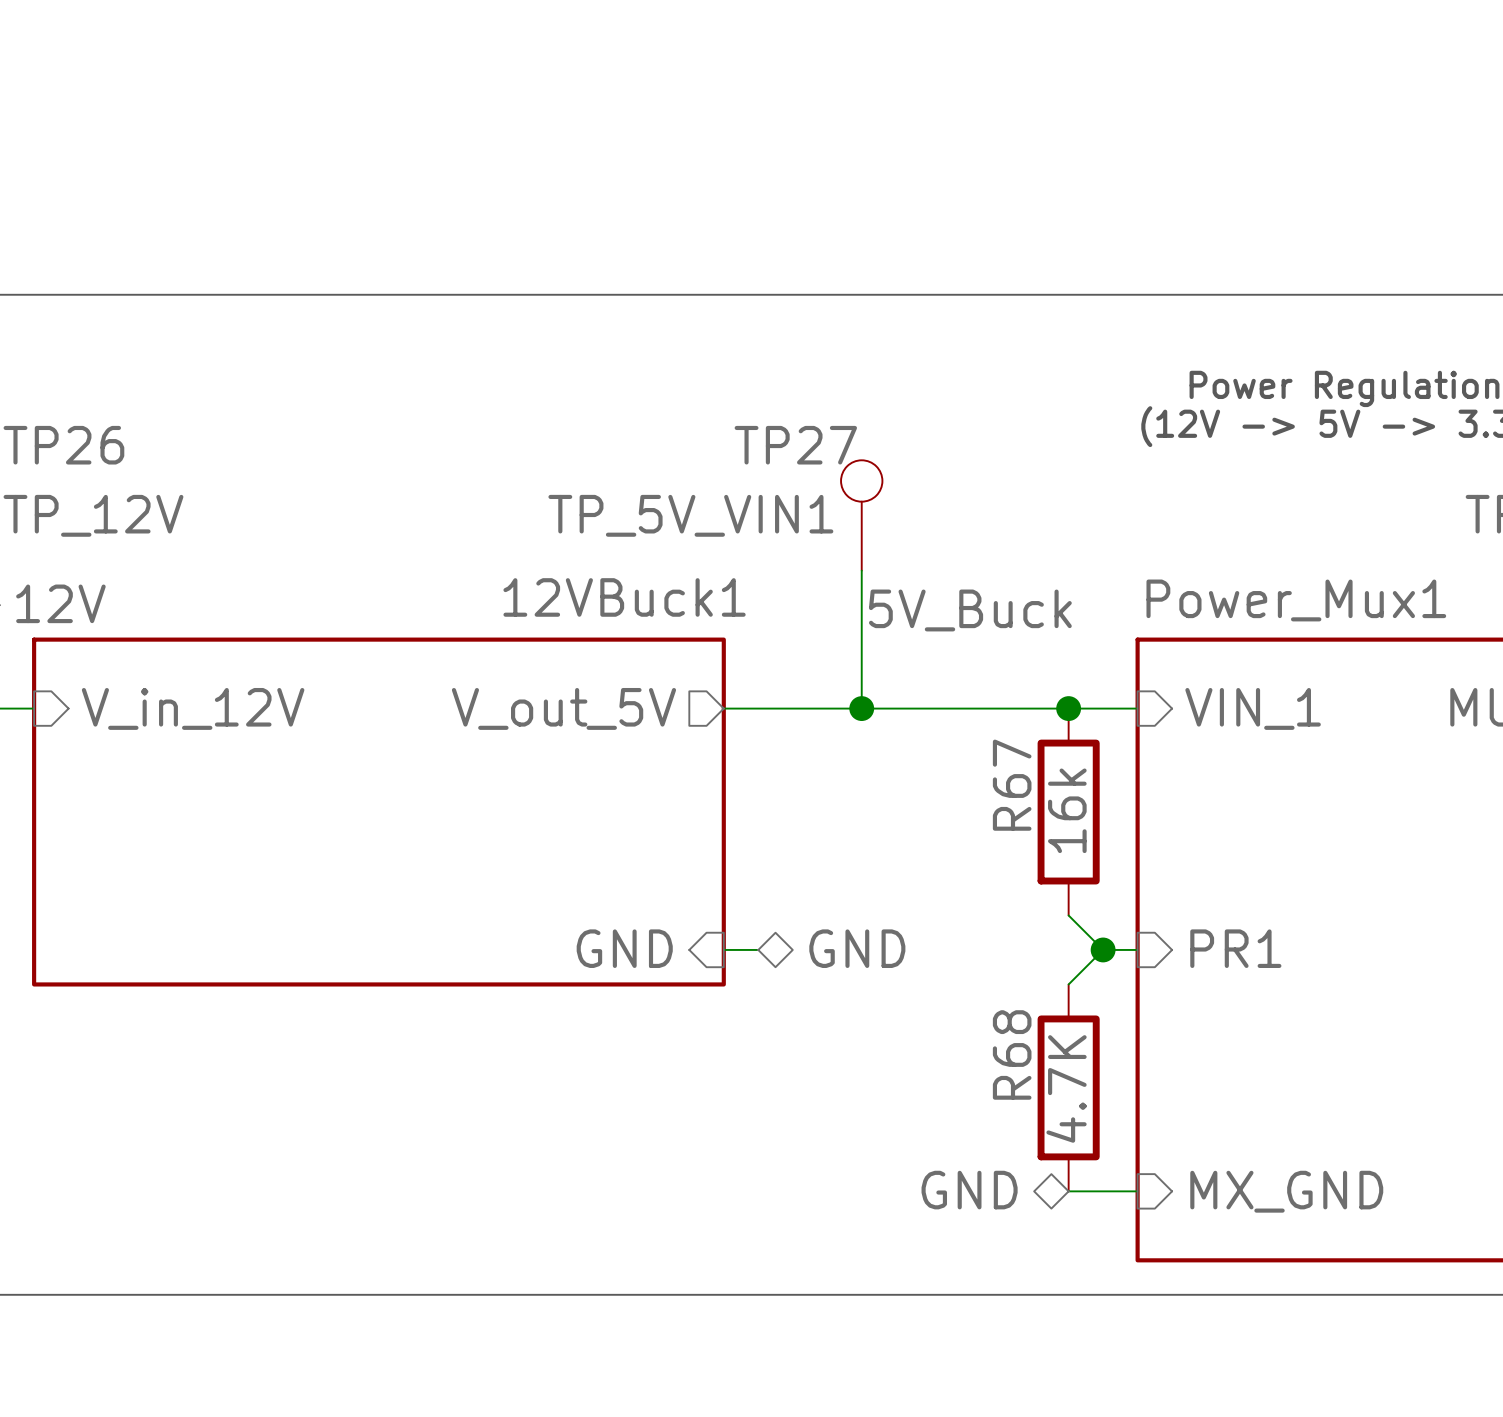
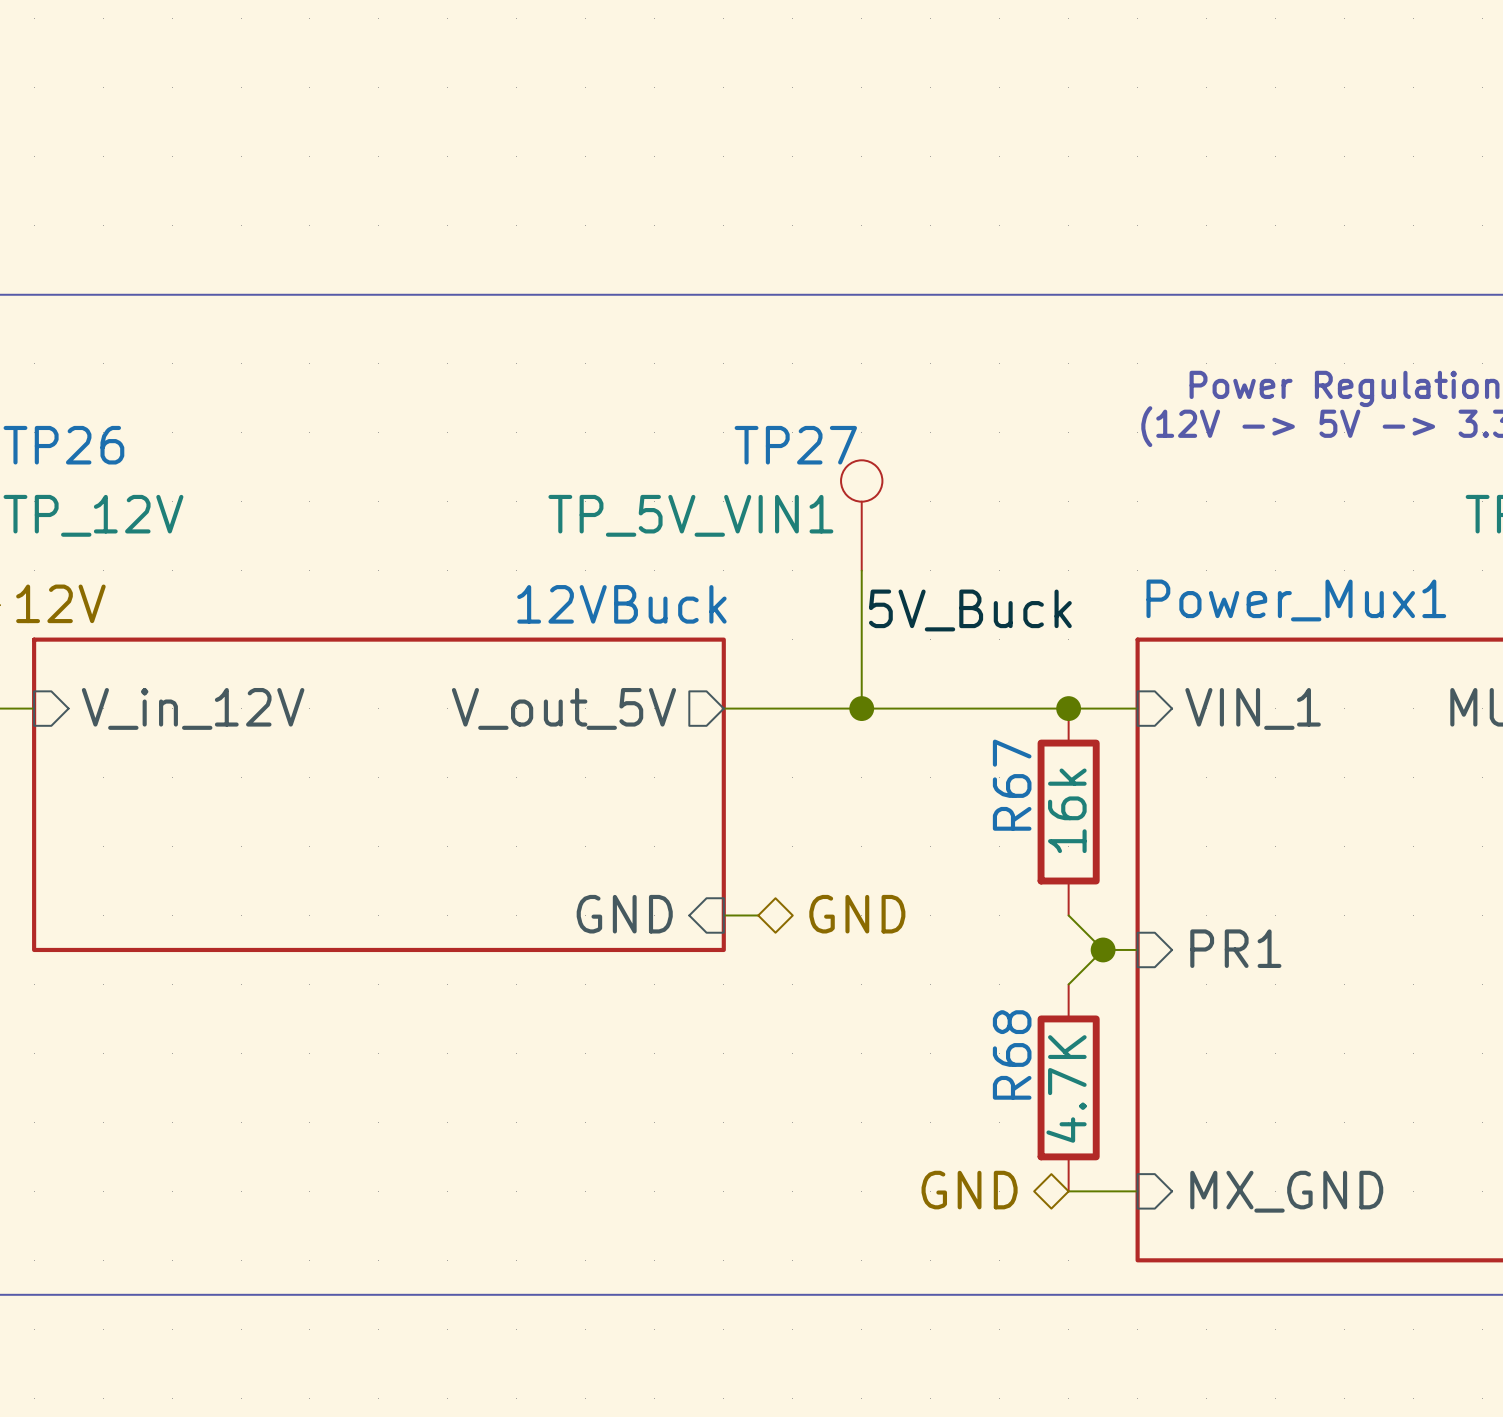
sheet 12VBuck: none -> (378, 794)
sheet 12VBuck1: (378, 812) -> none
sheet pin position: GND (624, 948) -> GND (624, 914)
hierarchical label position: GND (857, 948) -> GND (857, 914)
wire: (723, 949) (758, 949) -> (723, 915) (758, 915)

